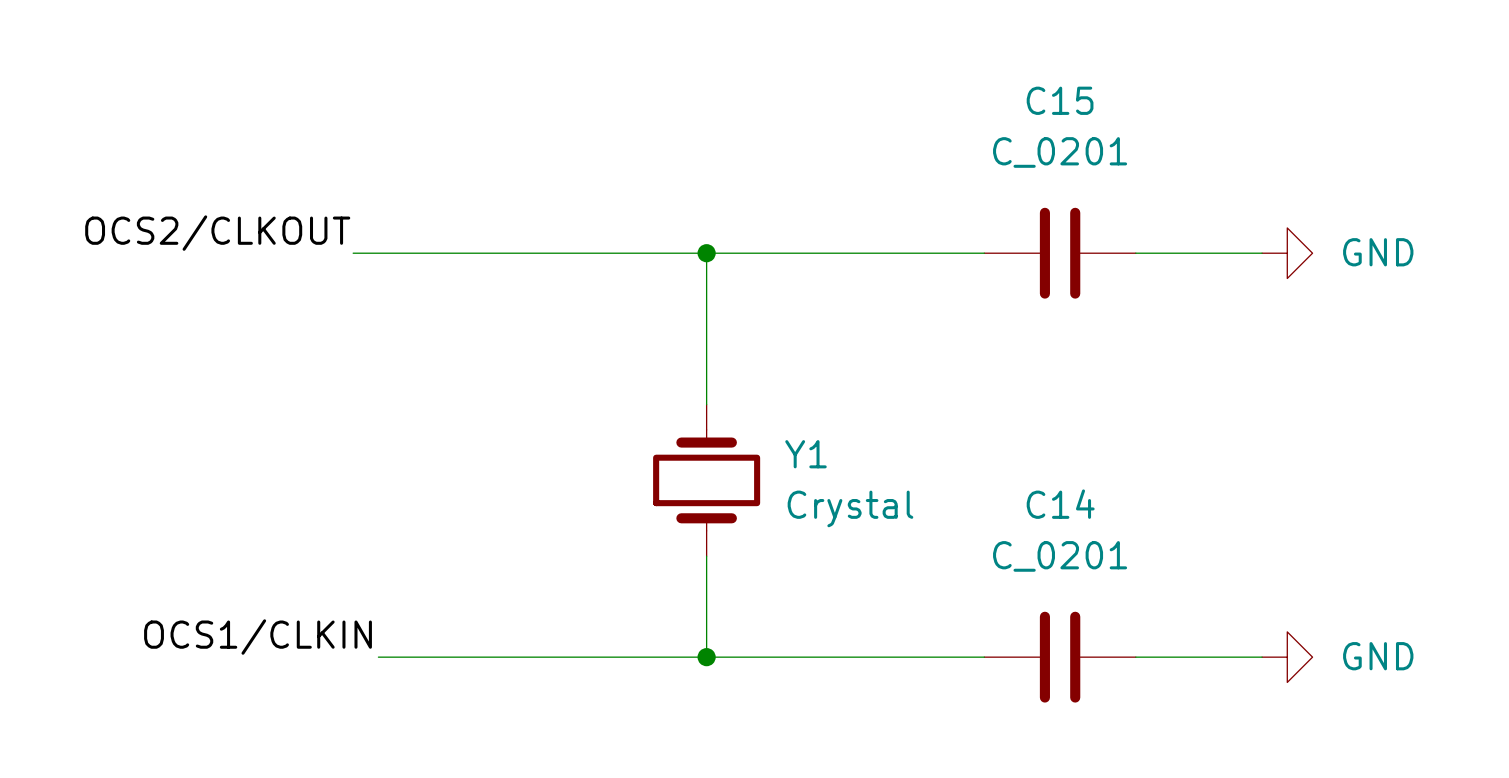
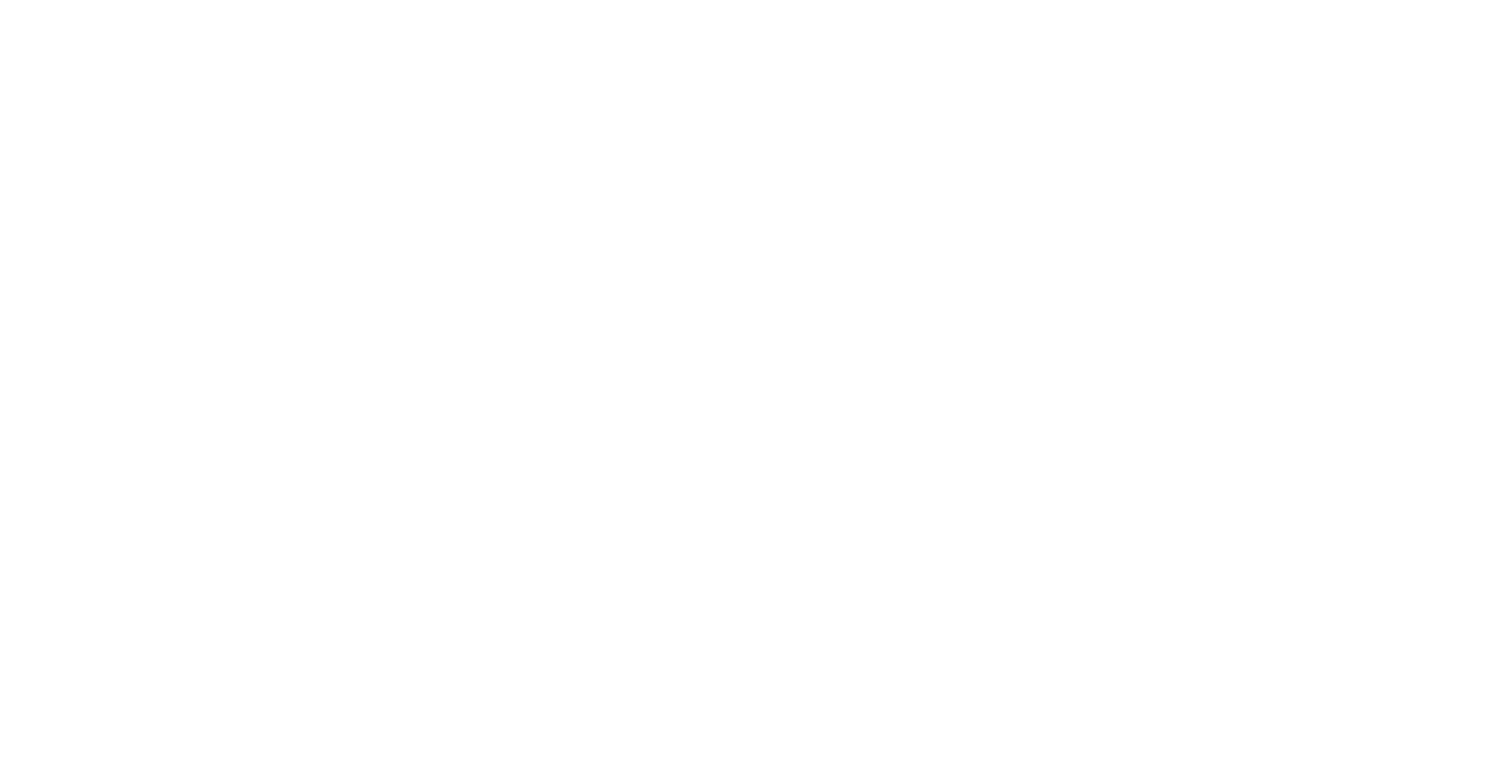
label: OCS2/CLKOUT (217, 233) -> none
wire: (353, 253) (984, 253) -> none
wire: (706, 253) (706, 404) -> none
junction: (706, 253) -> none
C15: C_0201 (1060, 253) -> none
wire: (1135, 253) (1262, 253) -> none
power symbol: GND (1287, 253) -> none
Y1: Crystal (706, 480) -> none
wire: (706, 556) (706, 657) -> none
label: OCS1/CLKIN (258, 637) -> none
wire: (378, 657) (984, 657) -> none
junction: (706, 657) -> none
C14: C_0201 (1060, 657) -> none
wire: (1135, 657) (1262, 657) -> none
power symbol: GND (1287, 657) -> none

